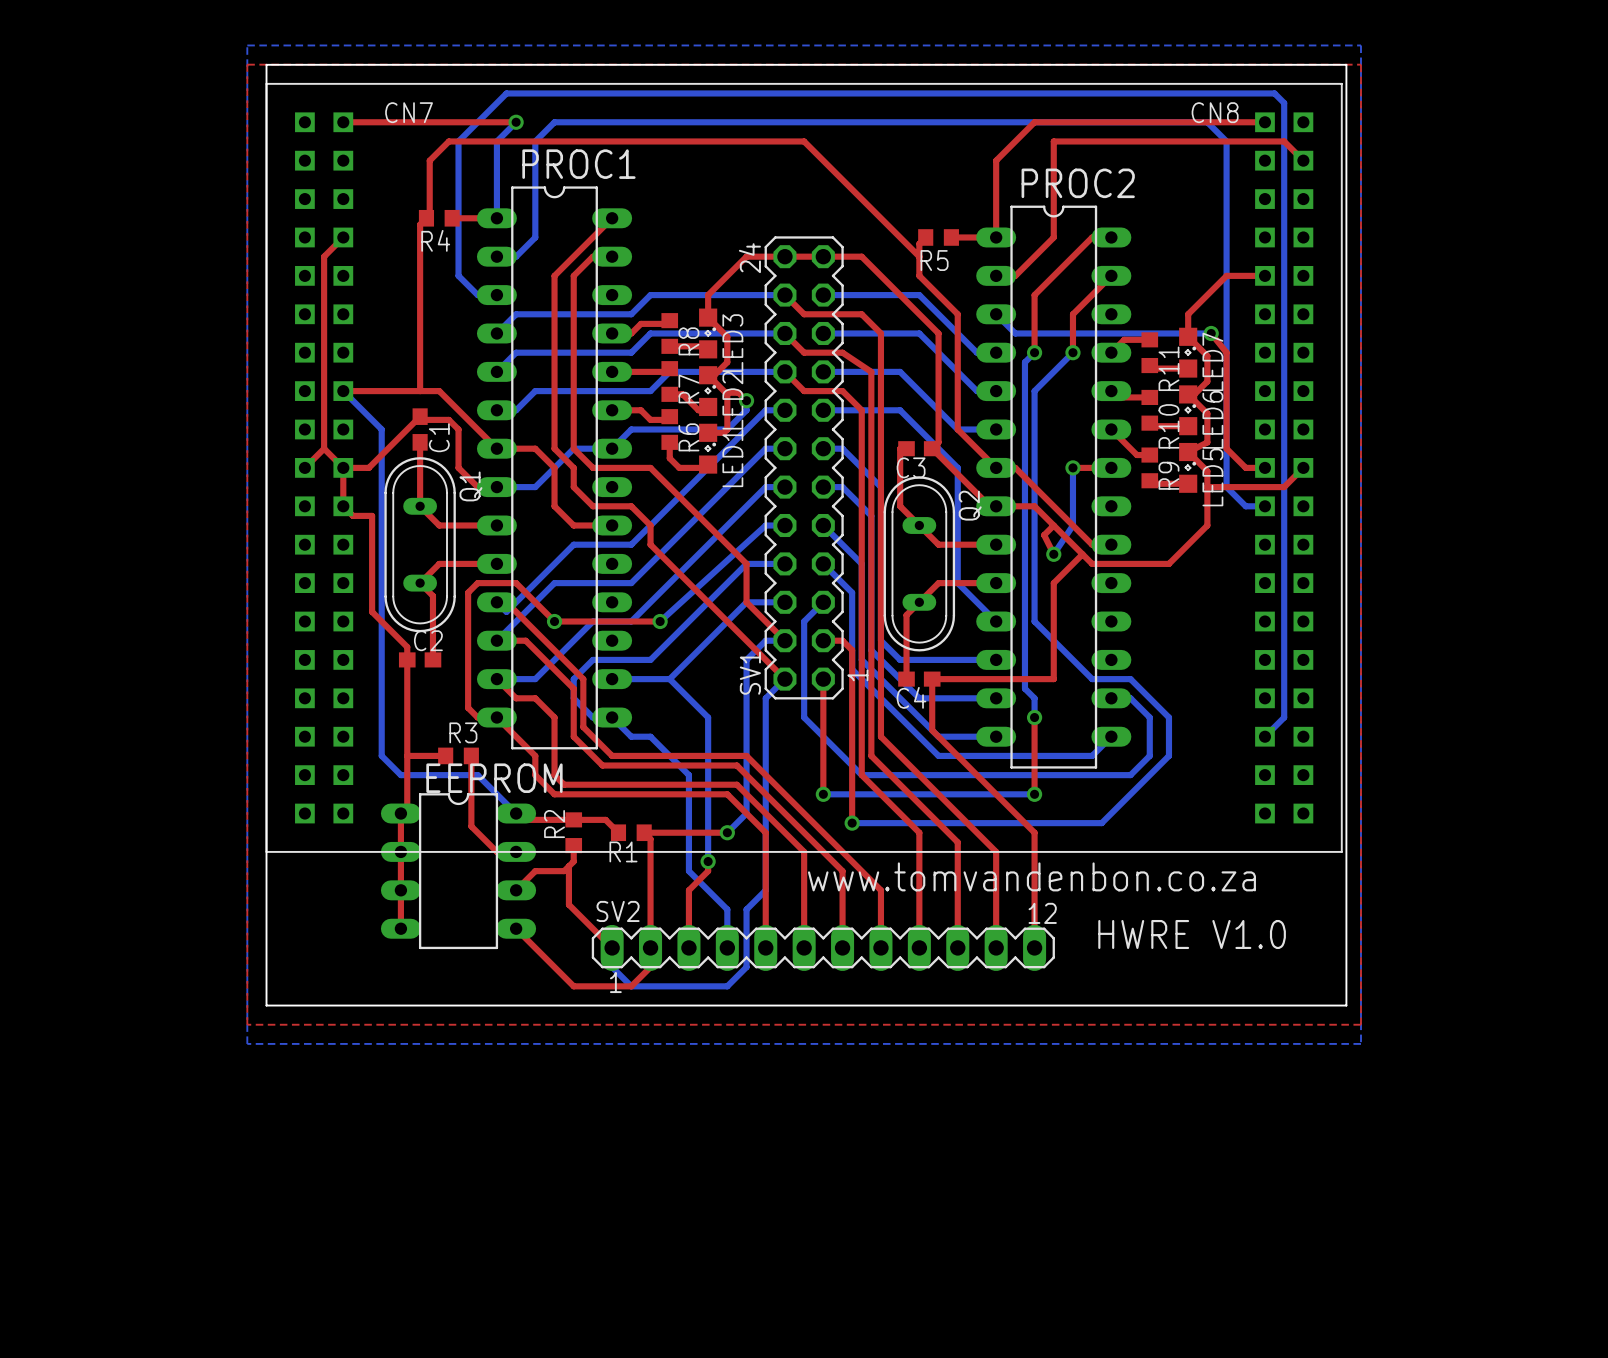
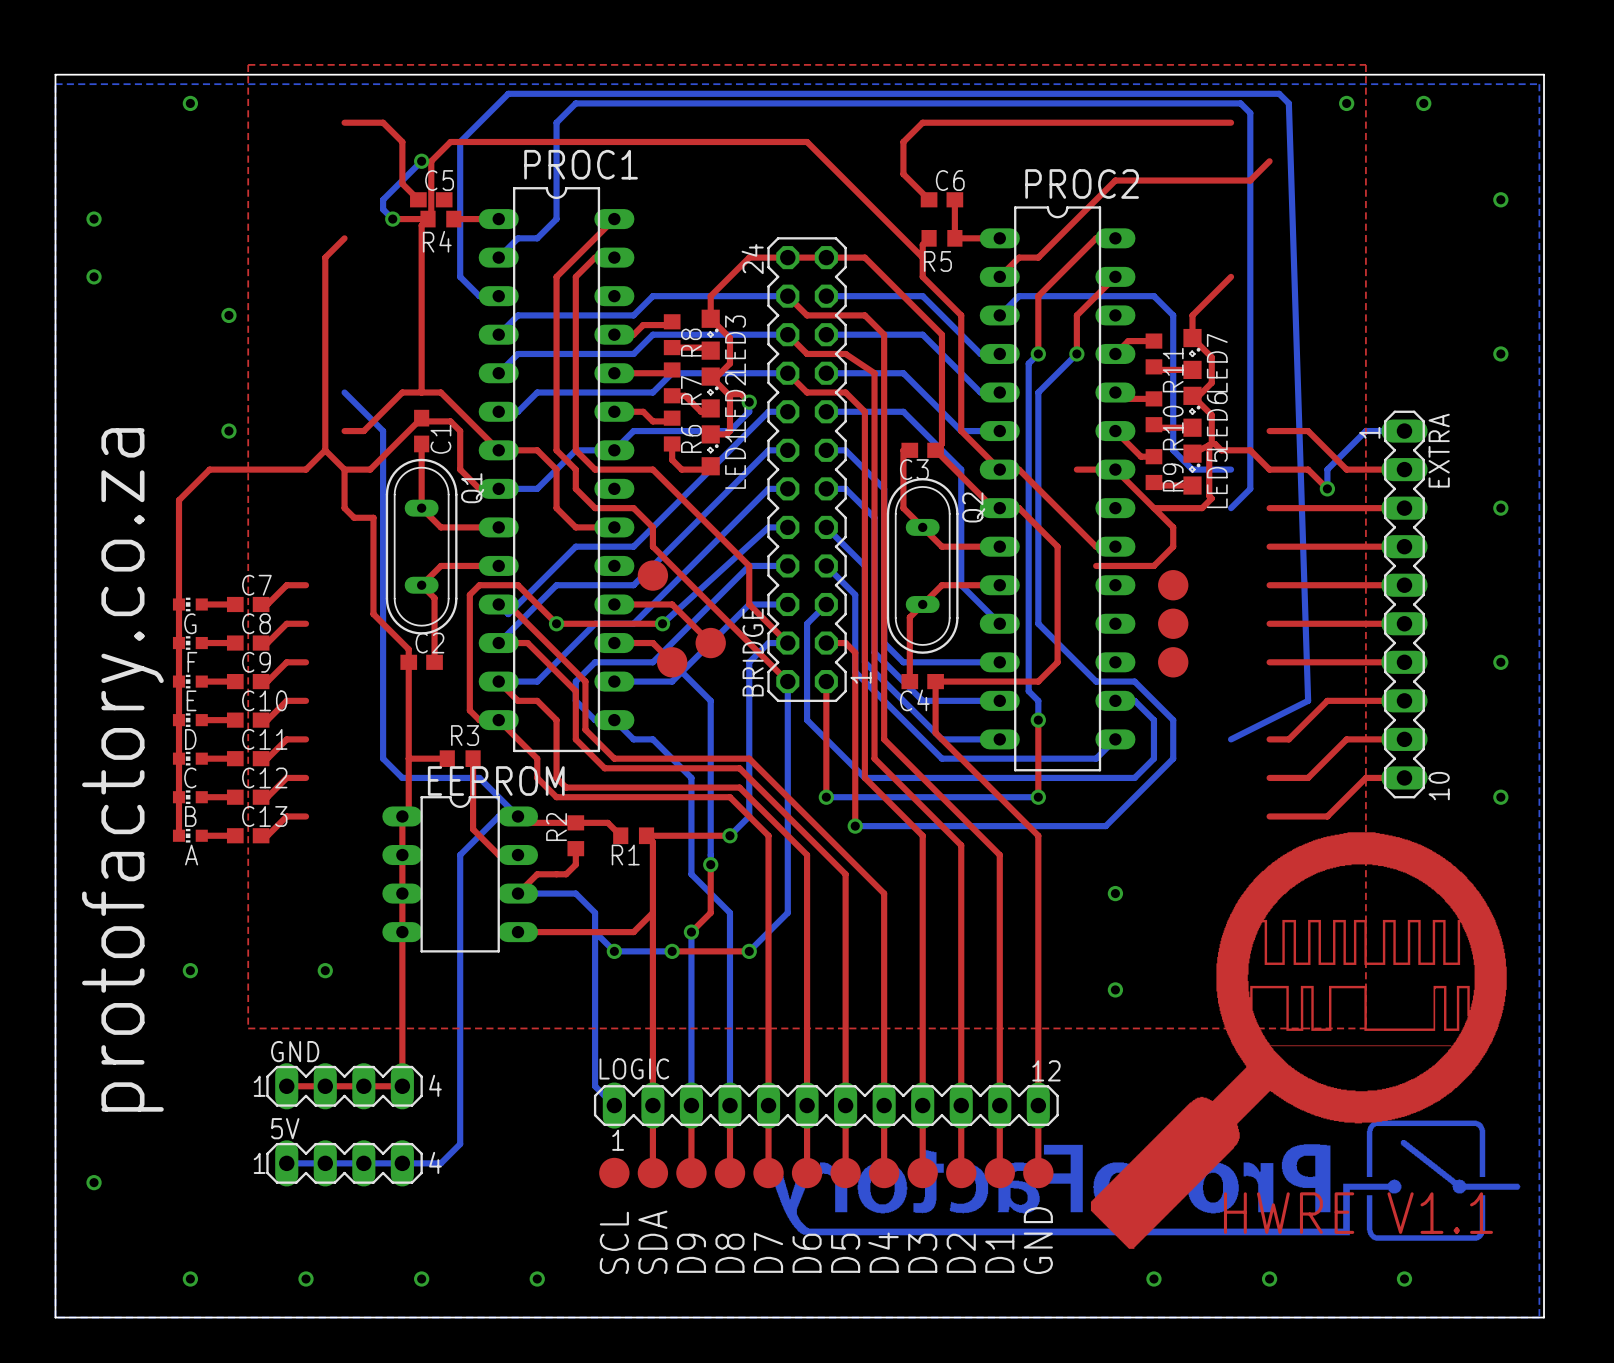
bottom zone outline: (247, 45) (1360, 45) (1360, 1043) (247, 1043) (247, 45) -> (55, 84) (55, 1317) (1539, 1317) (1539, 84) (55, 84)
board edge: (266, 64) (1346, 64) (1346, 1005) (266, 1005) (266, 64) -> (55, 74) (55, 1317) (1544, 1317) (1544, 74) (55, 74)
via: none -> (190, 103)
bottom track: (1284, 103) (1284, 717) (1264, 736) -> (1288, 103) (1308, 700) (1231, 739)
via: none -> (1346, 103)
via: none -> (1423, 103)
top track: (381, 122) (516, 122) -> (383, 122) (402, 141) (402, 183) (418, 199)
bottom track: (516, 122) (496, 141) (496, 218) -> none
via: (516, 122) -> none
top track: (1034, 122) (996, 160) (996, 237) -> (1038, 122) (922, 122) (903, 141) (903, 174) (929, 199)
top track: (1226, 122) (1264, 122) -> none
bottom track: none -> (421, 161) (383, 199) (383, 209) (392, 219)
via: none -> (421, 161)
top track: (1303, 160) (1284, 141) (1053, 141) (1053, 237) -> (1269, 161) (1250, 180) (1115, 180) (1057, 238)
C5: none -> (431, 199)
C6: none -> (941, 199)
top track: none -> (954, 199) (954, 238)
via: none -> (1500, 199)
via: none -> (94, 219)
top track: none -> (392, 219) (428, 219)
via: none -> (392, 219)
bottom track: (496, 256) (516, 256) (535, 237) (535, 141) (554, 122) (1207, 122) (1226, 141) (1226, 487) (1245, 506) (1264, 506) -> (498, 257) (518, 238) (537, 238) (556, 219) (556, 122) (575, 103) (1240, 103) (1250, 113) (1250, 488) (1231, 508)
top track: (1034, 256) (1015, 275) (996, 275) -> (1038, 257) (1019, 257) (999, 276)
via: none -> (94, 276)
top track: (1226, 275) (1264, 275) -> none
via: none -> (228, 315)
bottom track: (996, 314) (1015, 333) (1211, 333) -> (999, 315) (1019, 296) (1153, 296) (1173, 315) (1173, 450) (1192, 469) (1231, 469)
top track: (1211, 333) (1226, 352) (1226, 448) (1245, 467) (1264, 467) -> none
via: (1211, 333) -> none
via: none -> (1500, 353)
top track: (343, 391) (400, 391) -> (344, 431) (363, 431) (402, 392)
via: none -> (228, 431)
top track: none -> (1269, 431) (1308, 431) (1346, 469) (1404, 469)
bottom track: none -> (1404, 431) (1365, 431) (1327, 469) (1327, 488)
top track: none -> (1211, 444) (1215, 444) (1221, 450) (1250, 450) (1269, 469) (1308, 469) (1327, 488)
top track: none -> (1209, 445) (1209, 495) (1211, 498) (1202, 508) (1153, 508)
top track: (1188, 452) (1207, 471) (1207, 525) (1168, 563) (1149, 563) -> (1115, 469) (1173, 527) (1173, 546) (1153, 565)
top track: none -> (306, 469) (209, 469) (179, 500) (179, 835)
part: (804, 467) -> none
bottom track: (1072, 467) (1072, 525) (1053, 554) -> none
via: (1072, 467) -> none
top track: (1303, 467) (1284, 487) (1207, 487) -> none
via: none -> (1327, 488)
top track: (1015, 506) (1034, 506) (1092, 563) -> (1019, 508) (1057, 546) (1057, 585)
top track: none -> (1269, 508) (1404, 508)
via: none -> (1500, 508)
top track: (1053, 525) (1044, 535) (1053, 554) -> none
top track: none -> (1269, 546) (1404, 546)
via: (1053, 554) -> none
top track: (1082, 554) (1053, 583) -> none
part: none -> (652, 575)
top track: none -> (306, 585) (286, 585) (267, 604) (261, 604)
part: none -> (1173, 585)
top track: none -> (1269, 585) (1404, 585)
G: none -> (190, 604)
top track: none -> (201, 604) (235, 604)
C7: none -> (248, 604)
top track: none -> (614, 604) (672, 604) (710, 643)
EXTRA: none -> (1404, 604)
top track: none -> (306, 623) (286, 623) (267, 643) (261, 643)
part: none -> (1173, 623)
top track: none -> (1269, 623) (1404, 623)
F: none -> (190, 643)
top track: none -> (201, 643) (235, 643)
C8: none -> (248, 643)
top track: none -> (614, 643) (652, 643) (672, 662)
part: none -> (710, 643)
top track: none -> (306, 662) (286, 662) (267, 681) (261, 681)
part: none -> (672, 662)
top track: (1053, 659) (1053, 679) (1034, 679) -> (1057, 662) (1038, 681)
part: none -> (1173, 662)
top track: none -> (1269, 662) (1404, 662)
via: none -> (1500, 662)
SV1 name: SV1 (750, 673) -> BRIDGE (753, 652)
E: none -> (190, 681)
top track: none -> (201, 681) (235, 681)
C9: none -> (248, 681)
bottom track: (669, 679) (708, 717) -> (681, 671) (710, 700) (710, 720)
bottom track: (784, 679) (765, 698) (765, 890) (746, 909) (746, 967) (727, 986) (631, 986) (612, 967) (612, 947) -> (787, 681) (787, 912) (749, 951)
top track: none -> (306, 700) (286, 700) (267, 720) (261, 720)
top track: none -> (1404, 700) (1327, 700) (1288, 739) (1269, 739)
D: none -> (190, 720)
top track: none -> (201, 720) (235, 720)
C10: none -> (248, 720)
top track: none -> (306, 739) (286, 739) (267, 758) (261, 758)
top track: none -> (1404, 739) (1346, 739) (1308, 777) (1269, 777)
C: none -> (190, 758)
top track: none -> (201, 758) (235, 758)
C11: none -> (248, 758)
text: none -> protofactory.co.za (122, 769)
top track: none -> (306, 777) (286, 777) (267, 797) (261, 797)
top track: none -> (1404, 777) (1365, 777) (1327, 816) (1269, 816)
B: none -> (190, 797)
top track: none -> (201, 797) (235, 797)
C12: none -> (248, 797)
via: none -> (1500, 797)
top track: none -> (306, 816) (286, 816) (267, 835) (261, 835)
bottom track: none -> (518, 816) (498, 816) (460, 855) (460, 1144) (440, 1163) (286, 1163)
drawing: none -> [767, 832, 1521, 1249]
A: none -> (190, 835)
top track: none -> (201, 835) (235, 835)
C13: none -> (248, 835)
top track: (568, 866) (568, 904) (612, 947) -> none
top track: (708, 871) (688, 890) (688, 947) -> (710, 874) (710, 912) (691, 932)
text: www.tomvandenbon.co.za (1031, 876) -> none
bottom track: none -> (518, 893) (575, 893) (595, 912) (595, 1086) (614, 1105)
via: none -> (1115, 893)
top track: none -> (402, 932) (402, 1086) (286, 1086)
top track: (516, 928) (573, 986) (631, 986) (650, 967) -> (518, 932) (633, 932) (652, 912)
bottom track: none -> (595, 932) (614, 951) (672, 951)
bottom track: none -> (691, 932) (691, 1105)
via: none -> (691, 932)
text: HWRE V1.0 (1192, 934) -> none
via: none -> (614, 951)
top track: none -> (672, 951) (749, 951)
via: none -> (672, 951)
bottom track: none -> (729, 951) (729, 1105)
via: none -> (749, 951)
top track: none -> (768, 951) (768, 1173)
top track: none -> (807, 951) (807, 1173)
SV2: (823, 947) -> none
top track: none -> (845, 951) (845, 1173)
top track: none -> (884, 951) (884, 1173)
top track: none -> (922, 951) (922, 1173)
top track: none -> (961, 951) (961, 1173)
top track: none -> (999, 951) (999, 1173)
top track: none -> (1038, 951) (1038, 1173)
via: none -> (190, 970)
via: none -> (325, 970)
top track: none -> (652, 970) (652, 1173)
via: none -> (1115, 989)
GND: none -> (344, 1086)
top track: none -> (691, 1105) (691, 1173)
top track: none -> (729, 1105) (729, 1173)
LOGIC: none -> (826, 1105)
5V: none -> (344, 1163)
part: none -> (614, 1173)
part: none -> (652, 1173)
part: none -> (691, 1173)
part: none -> (729, 1173)
part: none -> (768, 1173)
part: none -> (807, 1173)
part: none -> (845, 1173)
part: none -> (884, 1173)
part: none -> (922, 1173)
part: none -> (961, 1173)
part: none -> (999, 1173)
part: none -> (1038, 1173)
via: none -> (94, 1182)
text: none -> GND (1038, 1240)
text: none -> SDA (652, 1242)
text: none -> SCL (614, 1242)
text: none -> D9 (691, 1253)
text: none -> D8 (729, 1253)
text: none -> D7 (768, 1252)
text: none -> D6 (807, 1253)
text: none -> D5 (845, 1253)
text: none -> D4 (883, 1252)
text: none -> D3 (922, 1253)
text: none -> D2 (961, 1253)
text: none -> D1 (999, 1253)
via: none -> (190, 1278)
via: none -> (306, 1278)
via: none -> (421, 1278)
via: none -> (537, 1278)
via: none -> (1153, 1278)
via: none -> (1269, 1278)
via: none -> (1404, 1278)

